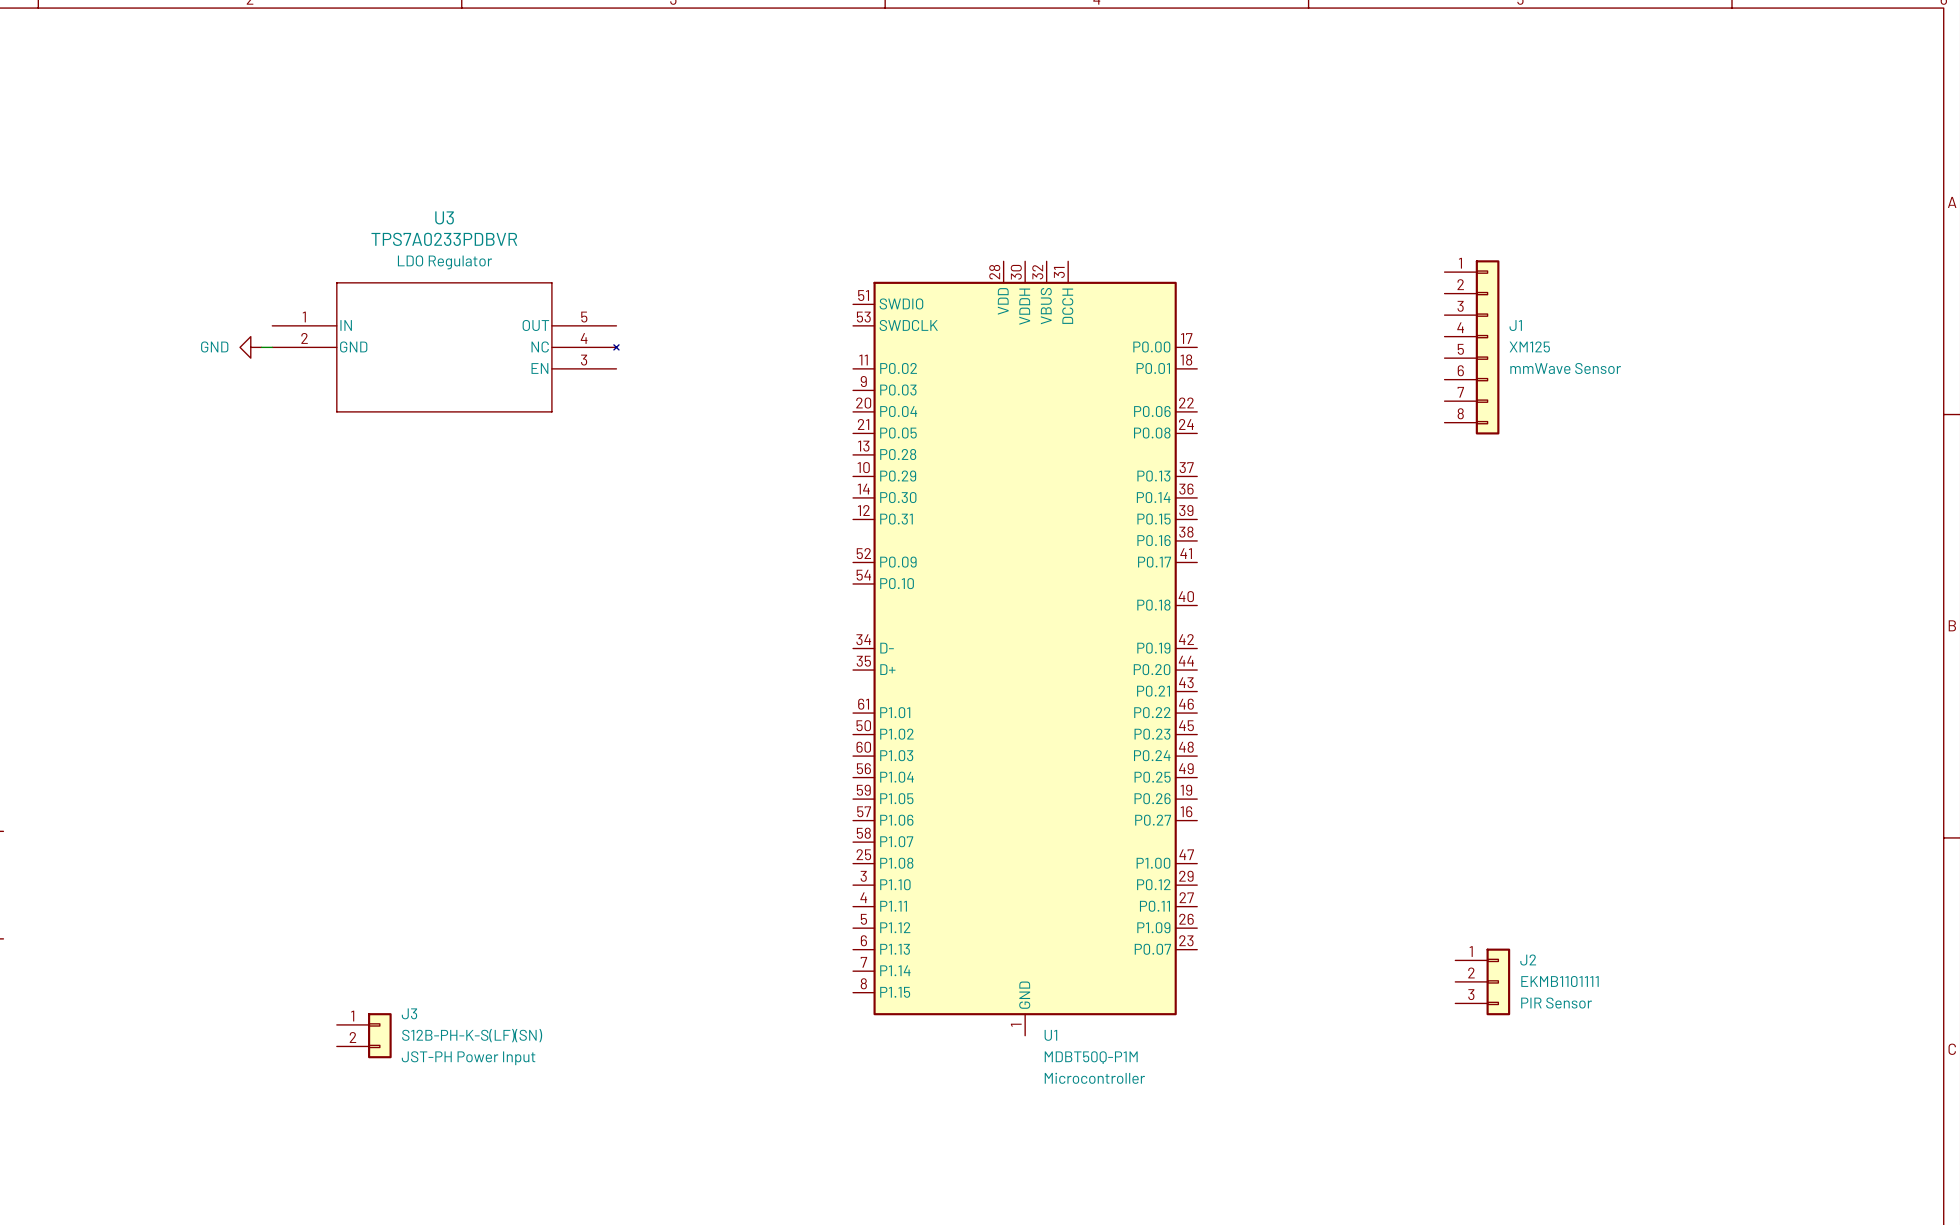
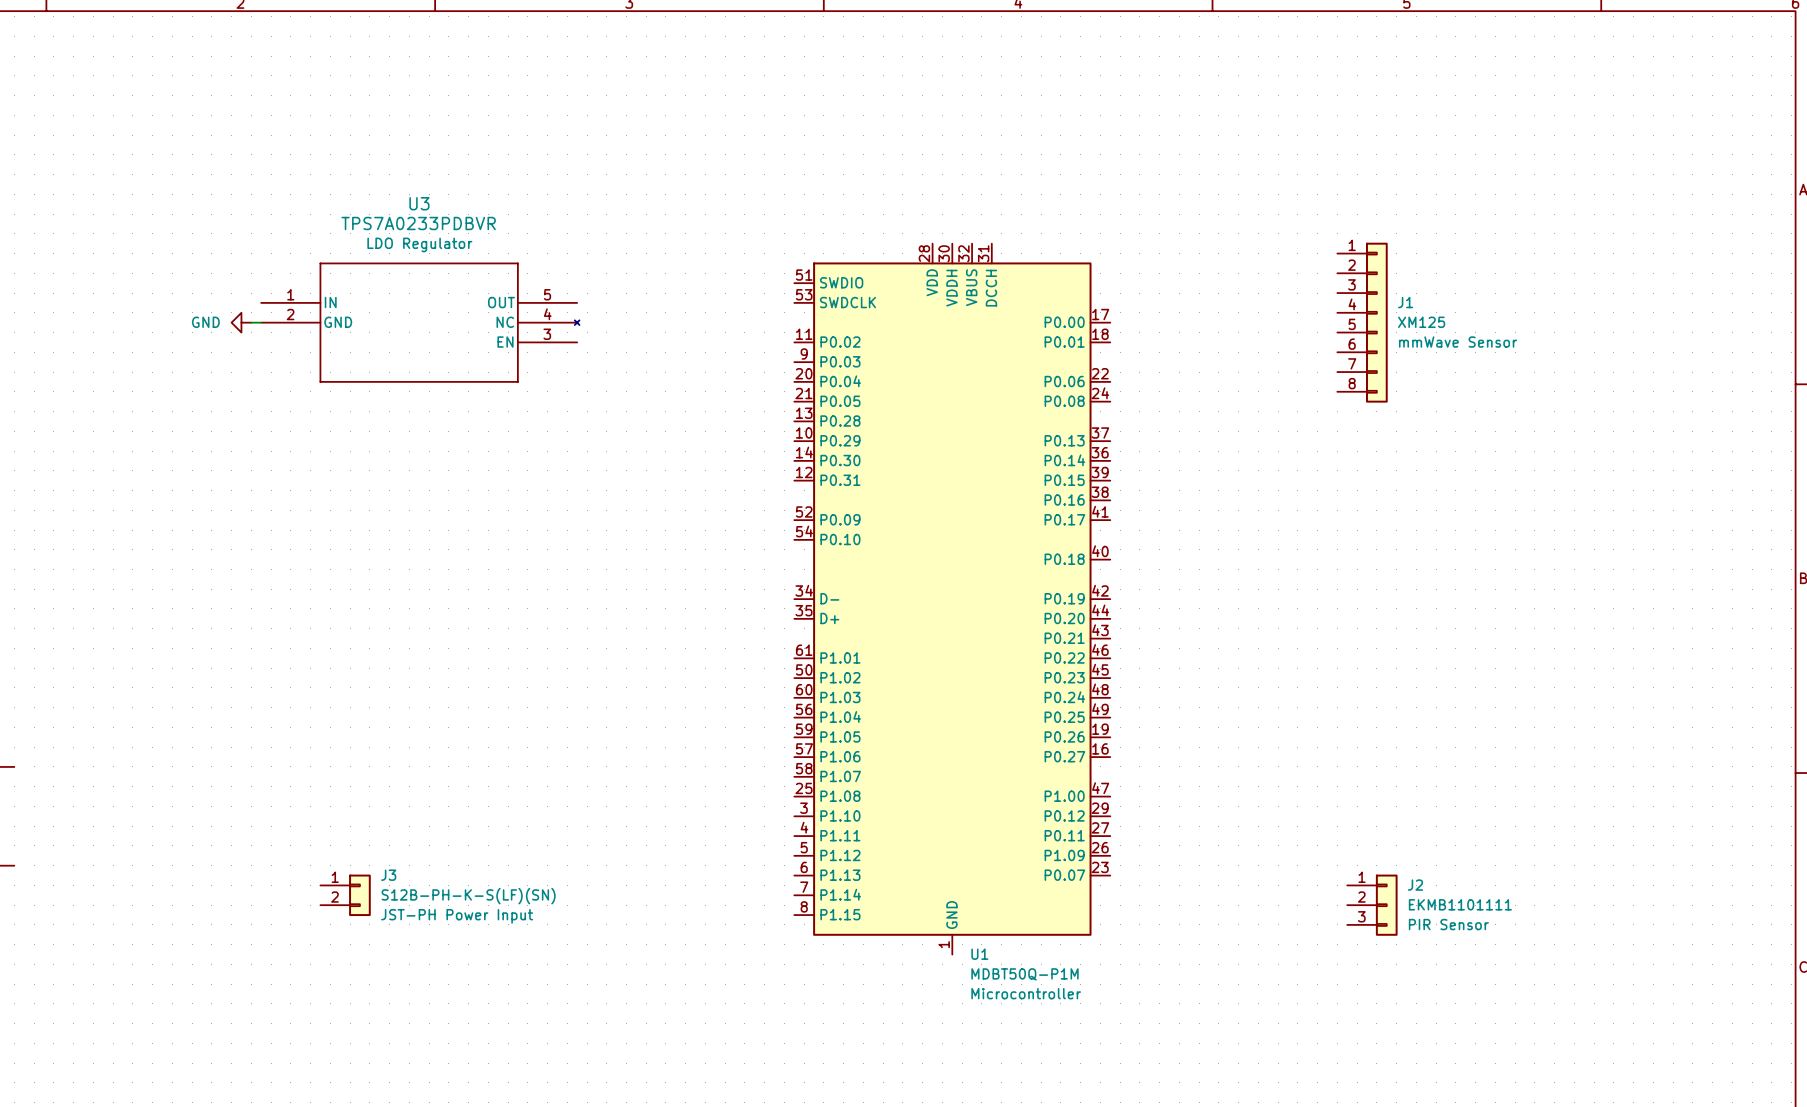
J3 position: (364, 1035) -> (345, 895)

